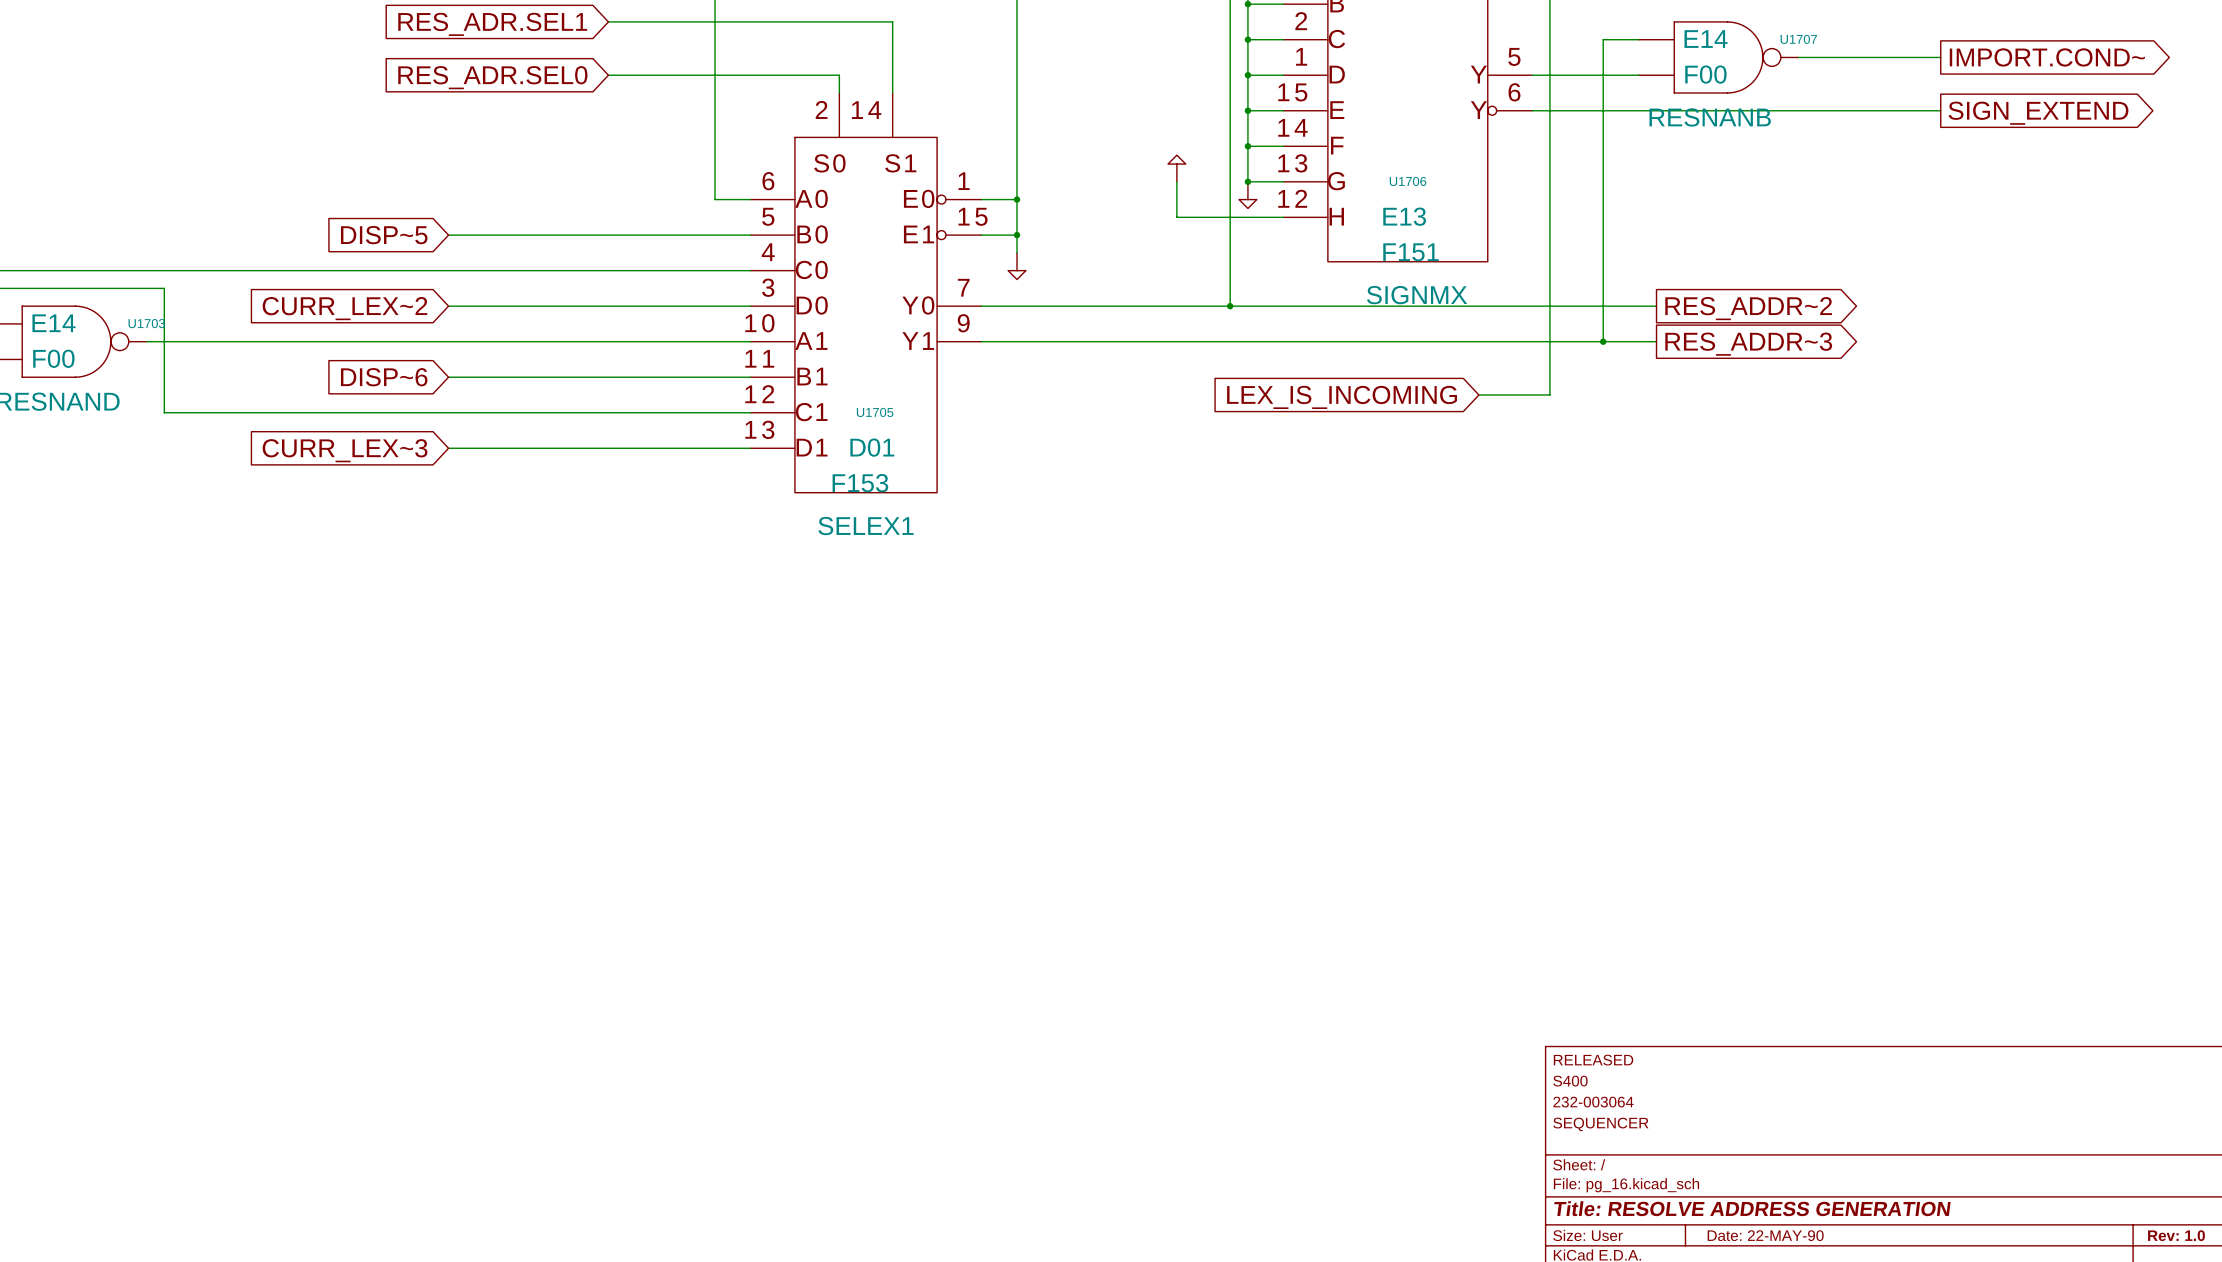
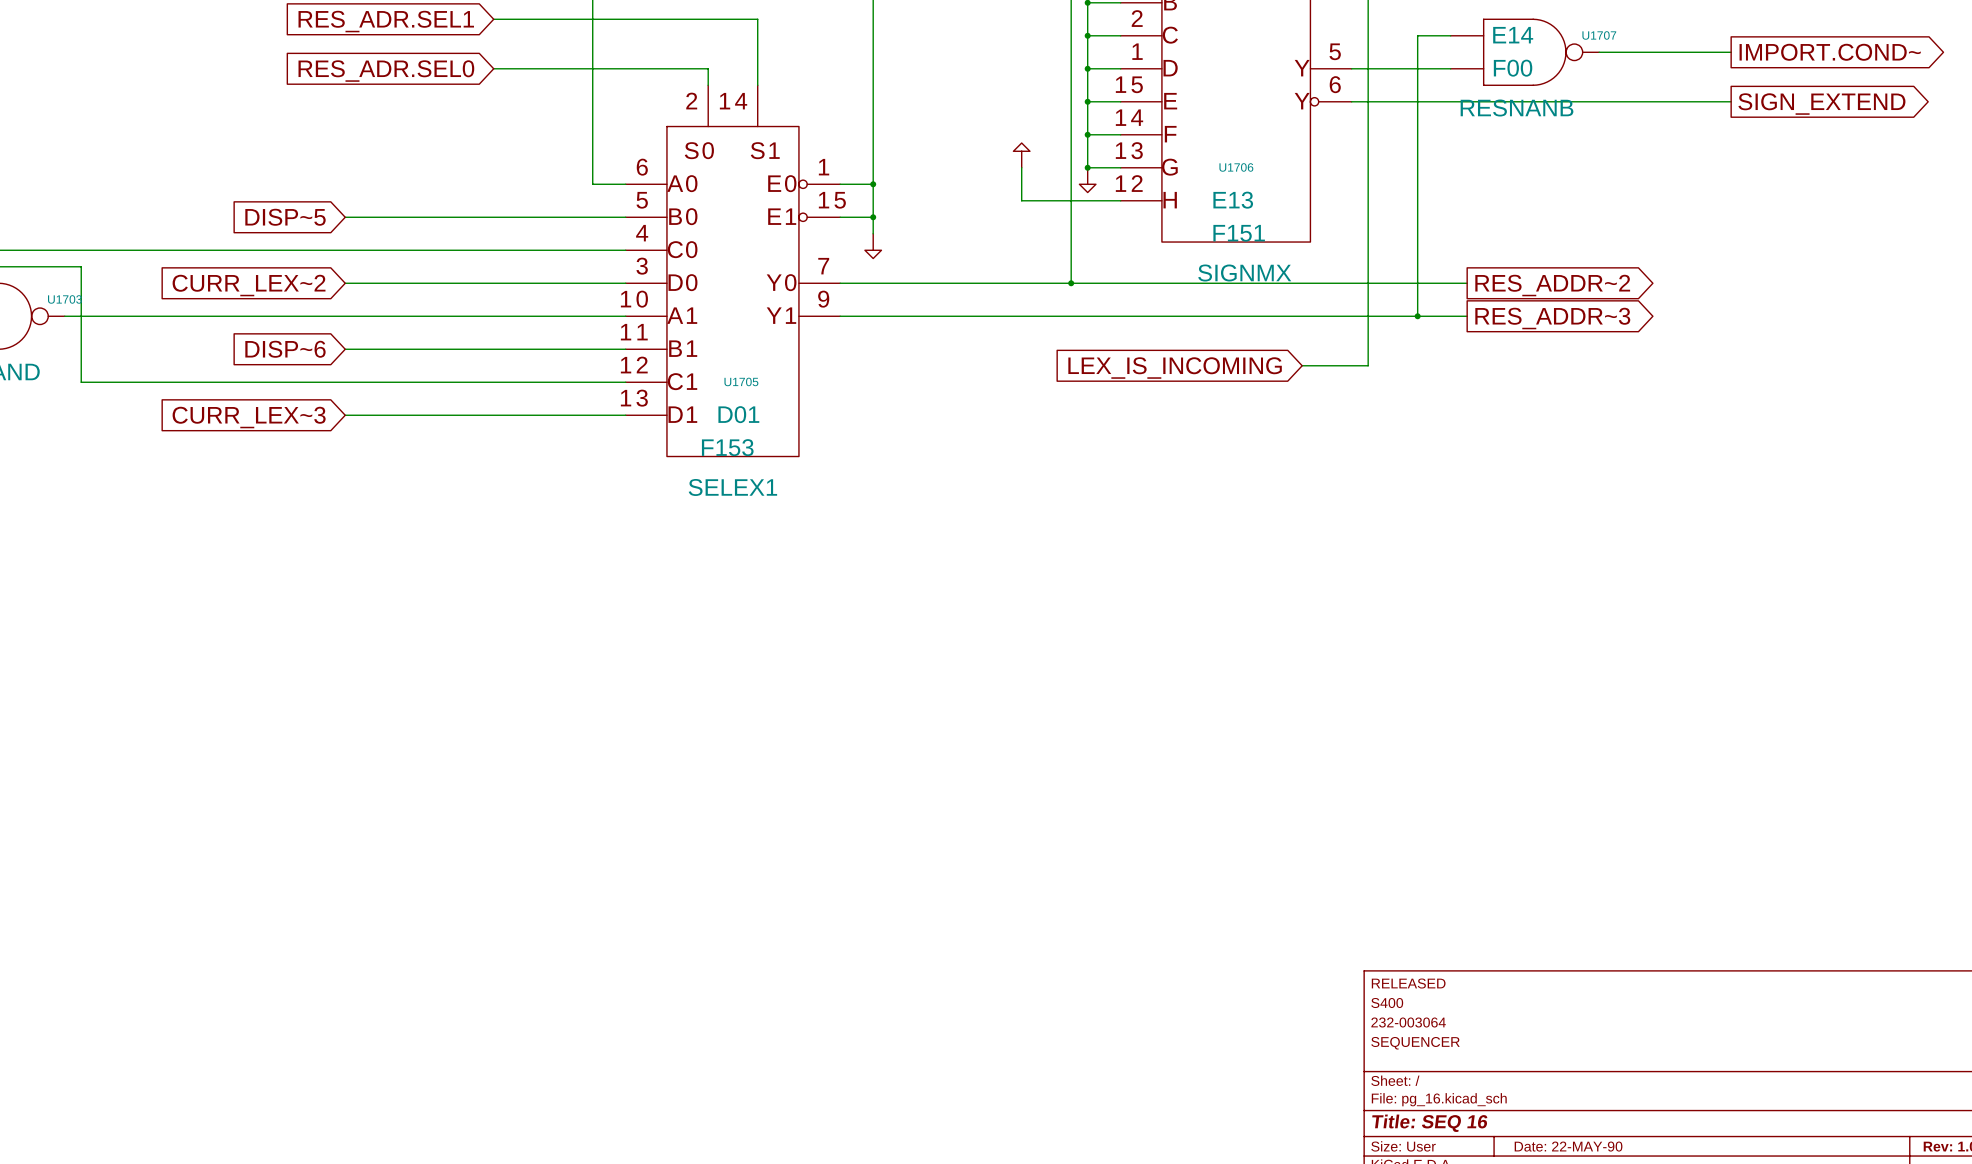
title block: Title: RESOLVE ADDRESS GENERATION (1752, 1208) -> Title: SEQ 16 (1429, 1123)

